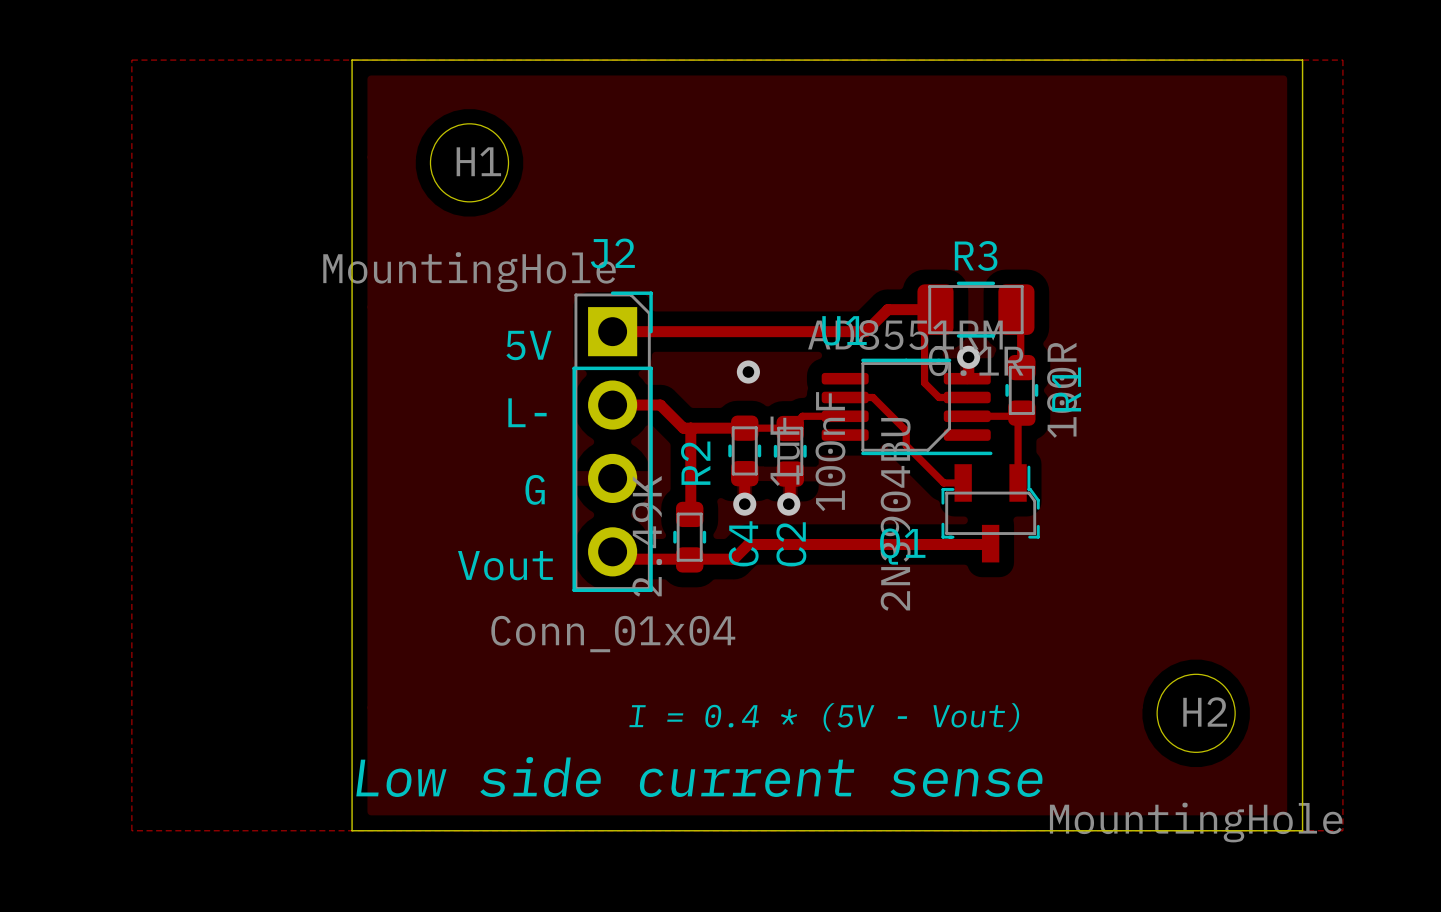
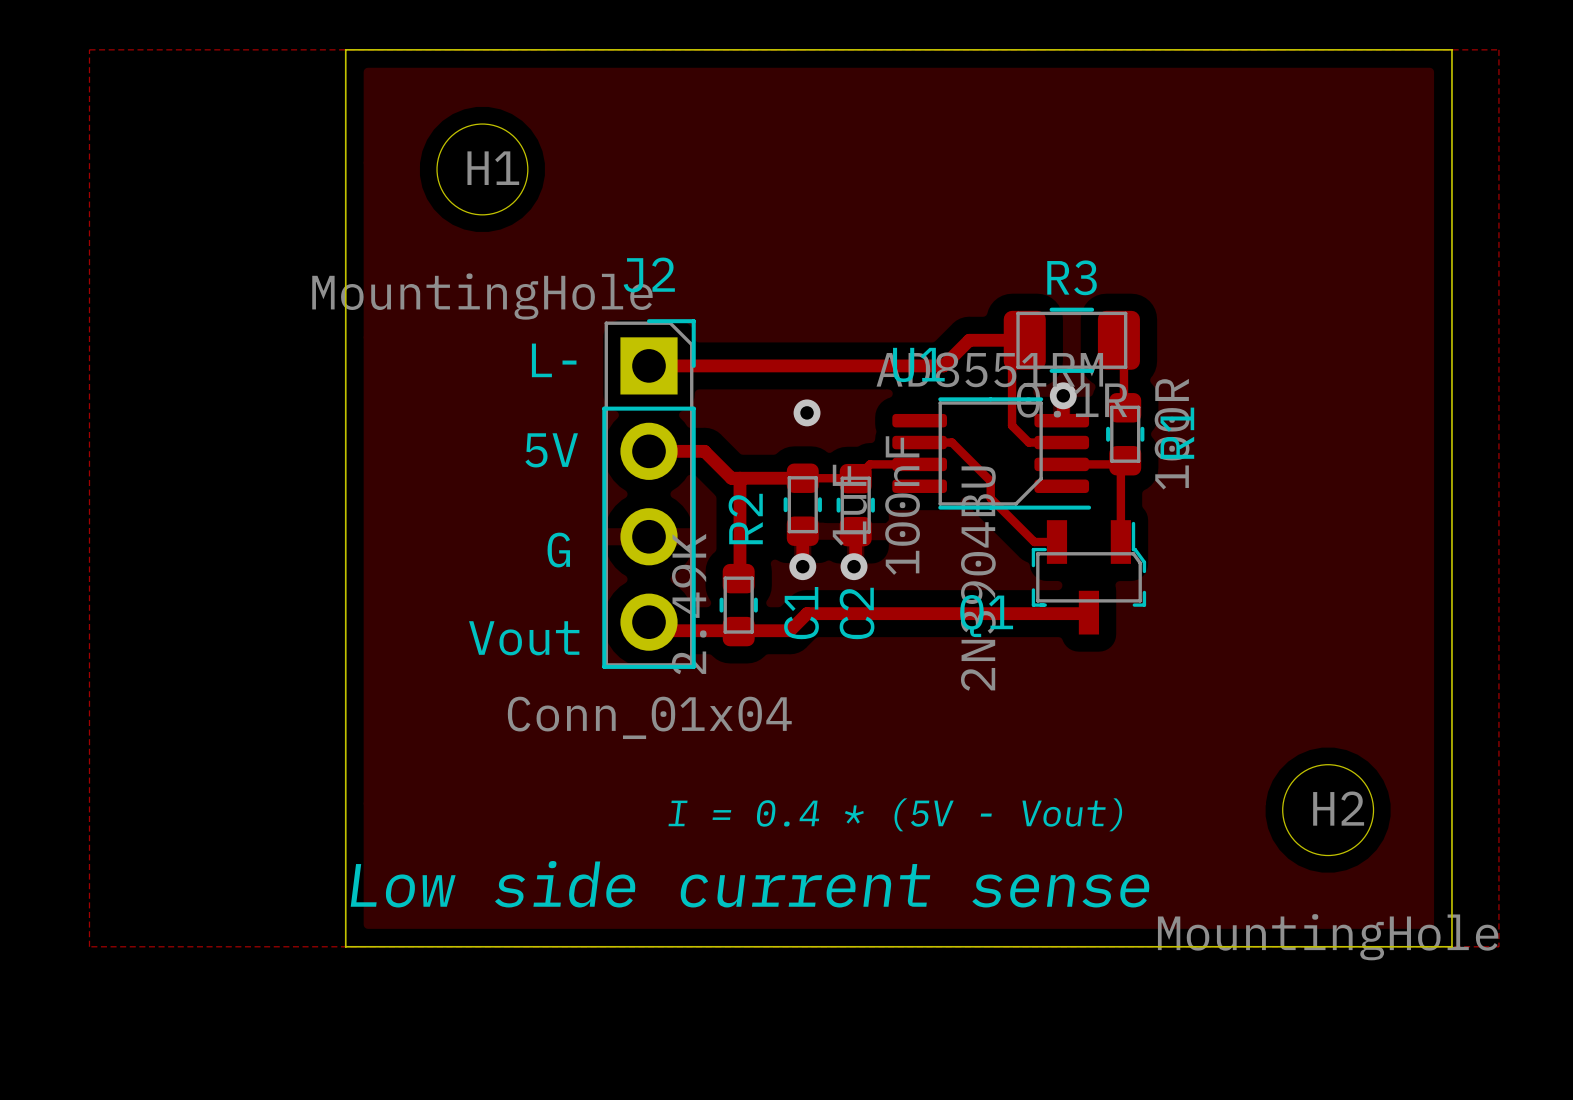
text: 5V (528, 345) -> L- (554, 360)
text: L- (527, 412) -> 5V (551, 450)
C4 name: C4 (743, 543) -> C1 (801, 613)

